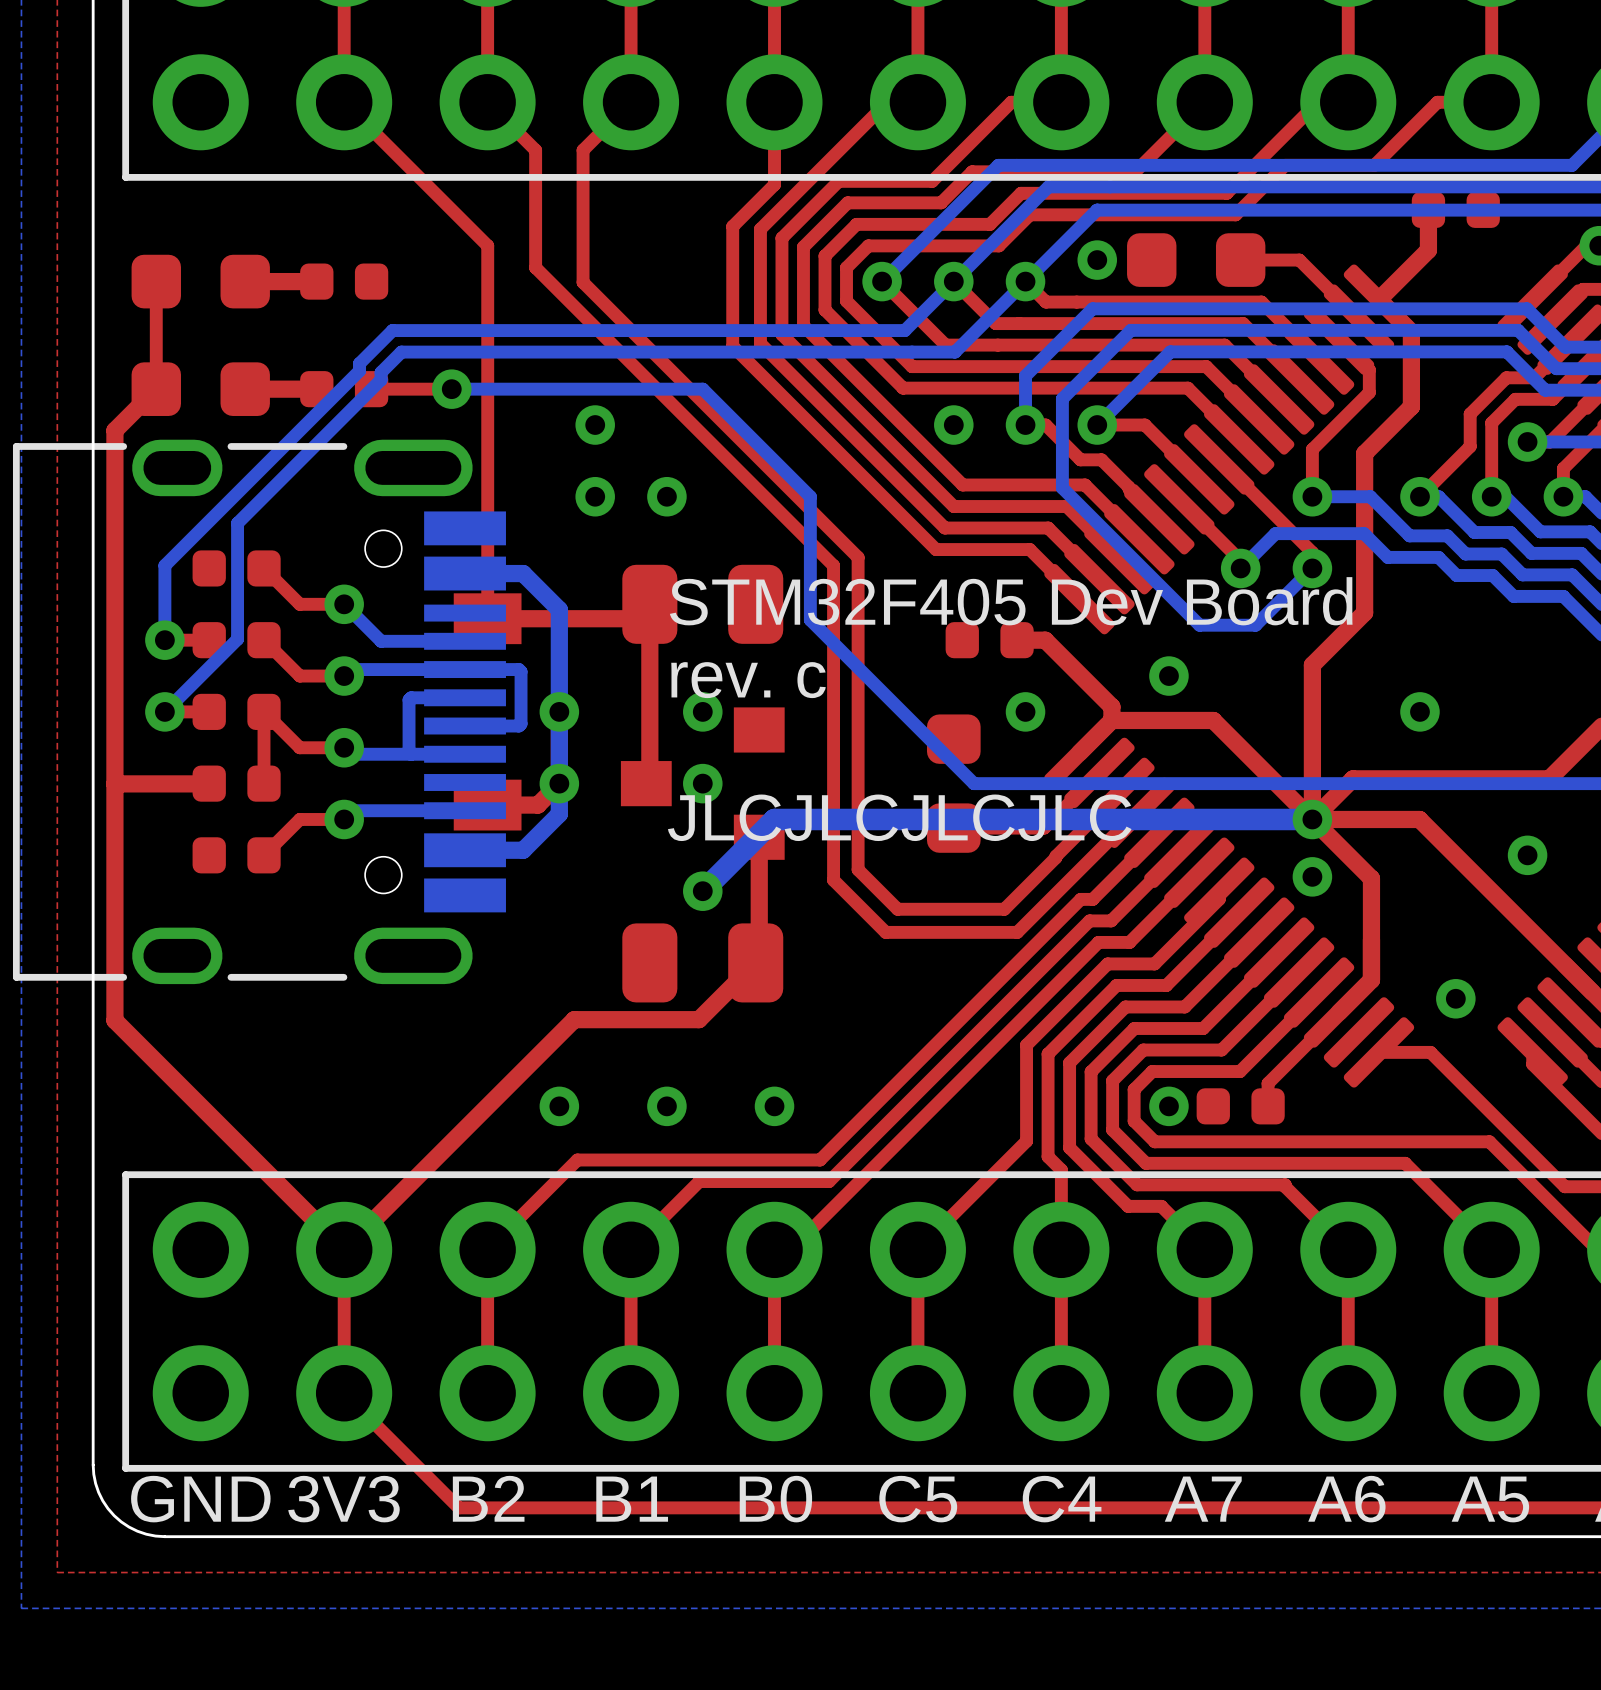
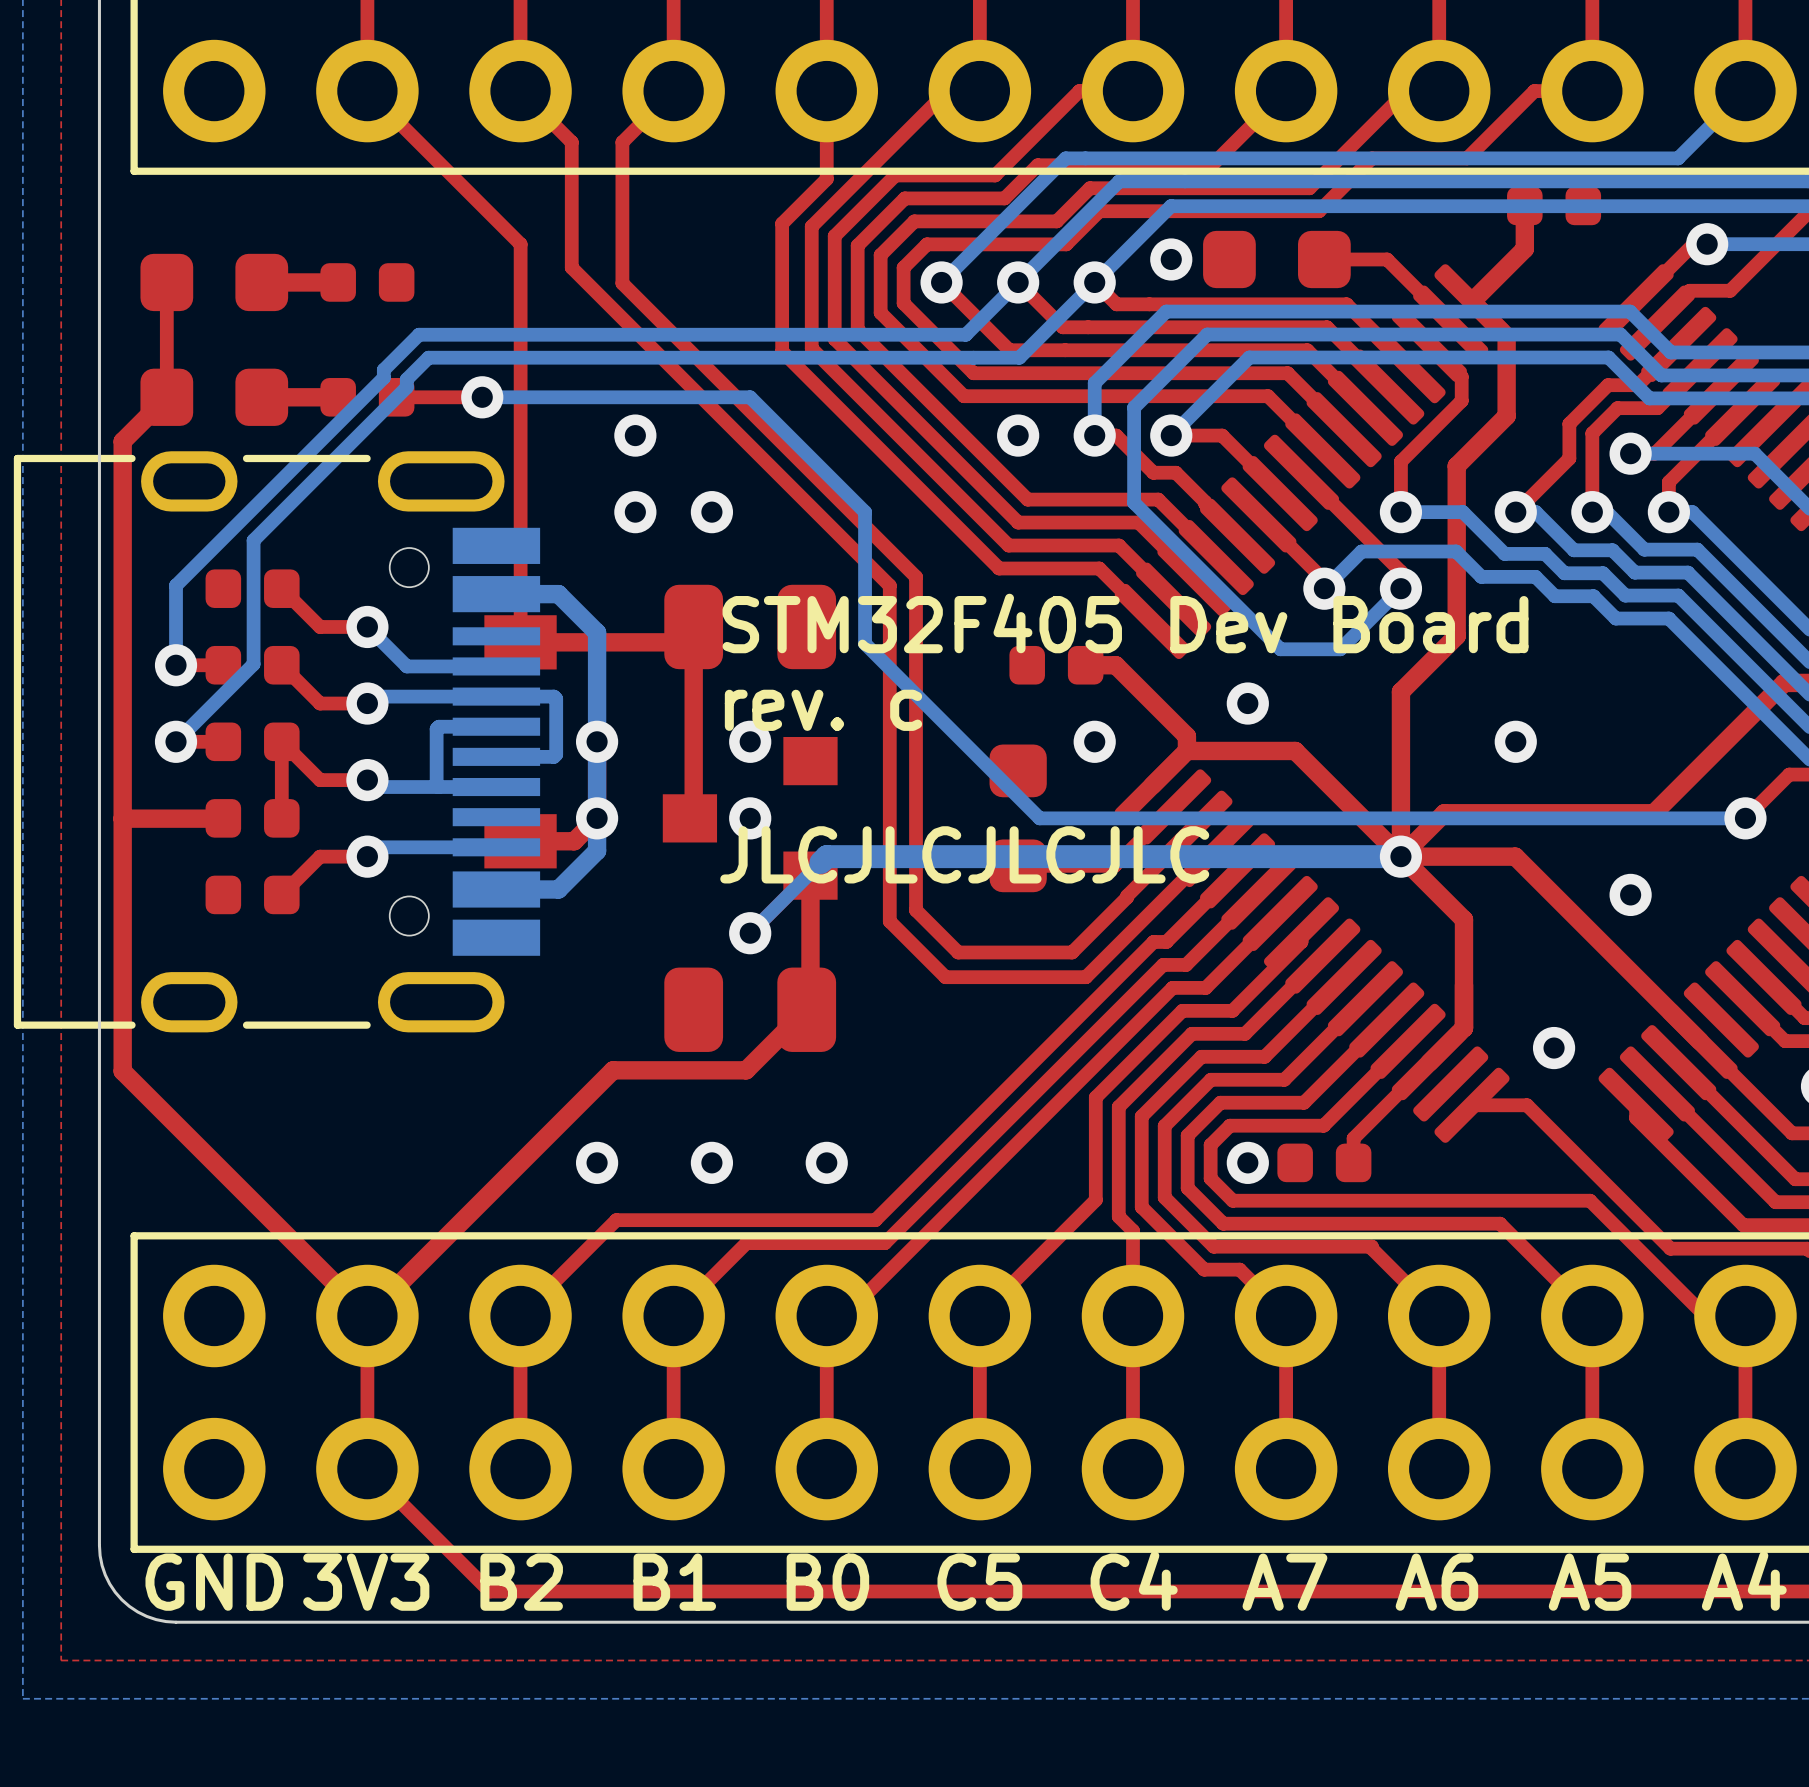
bottom track width: thick (769, 824) (702, 891) -> thin (820, 862) (750, 933)
via: (1312, 876) -> none

